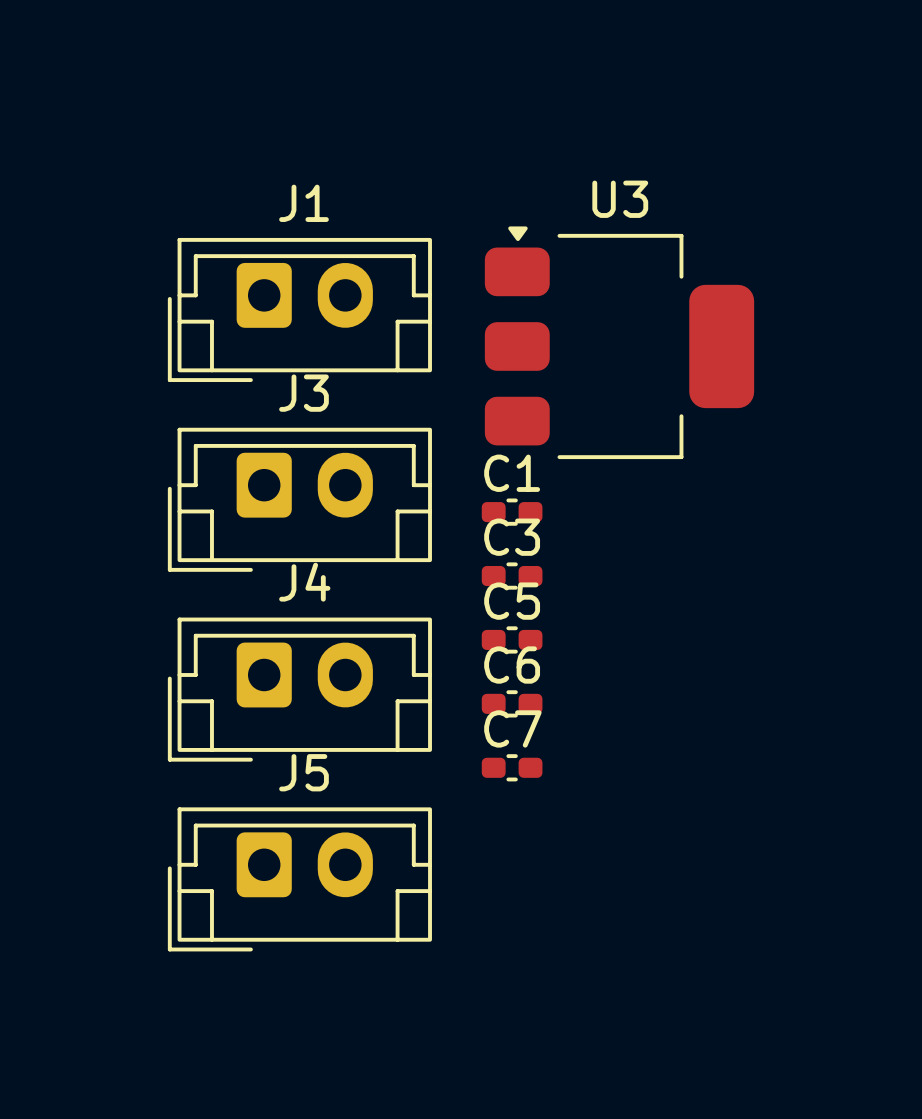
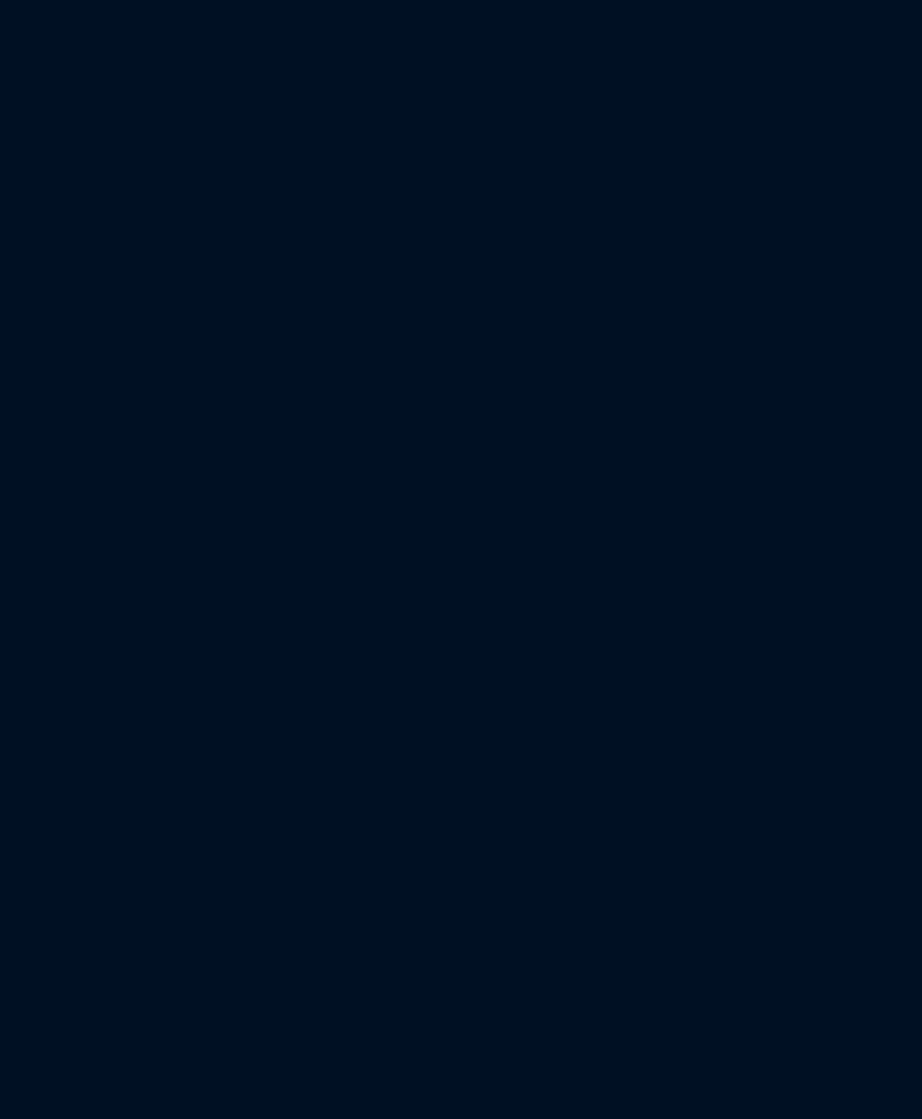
J1: (299, 309) -> none
U3: (619, 342) -> none
J3: (299, 499) -> none
C1: (512, 512) -> none
C3: (512, 576) -> none
C5: (512, 639) -> none
J4: (299, 689) -> none
C6: (512, 703) -> none
C7: (512, 767) -> none
J5: (299, 879) -> none

